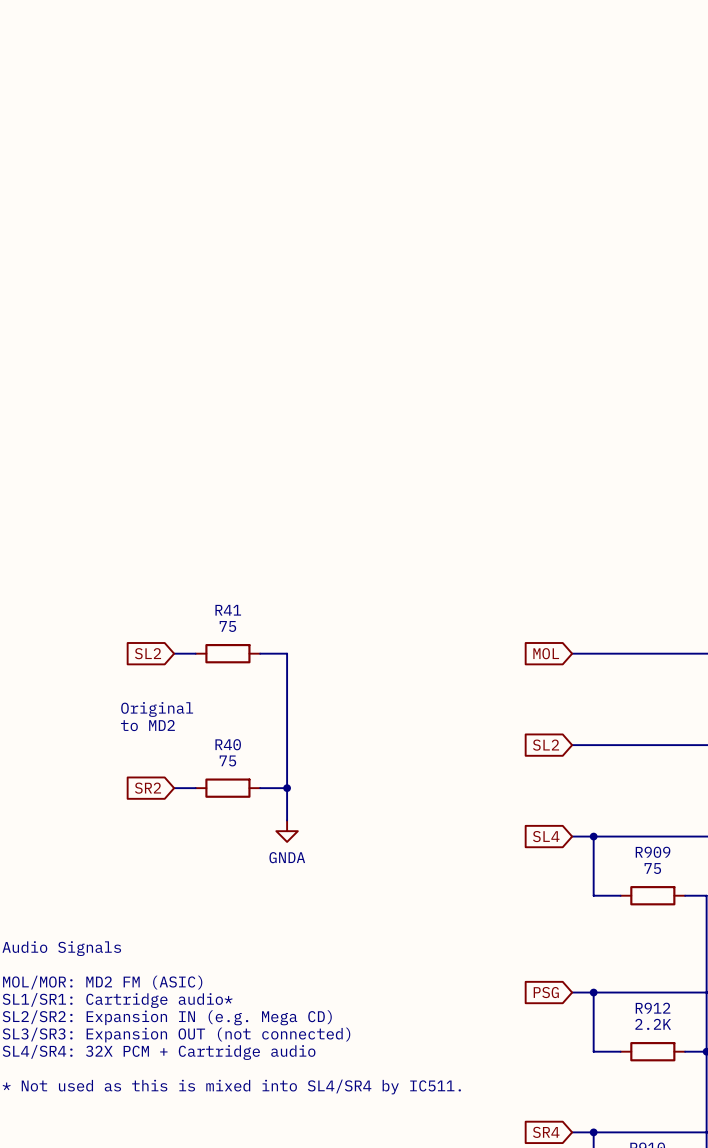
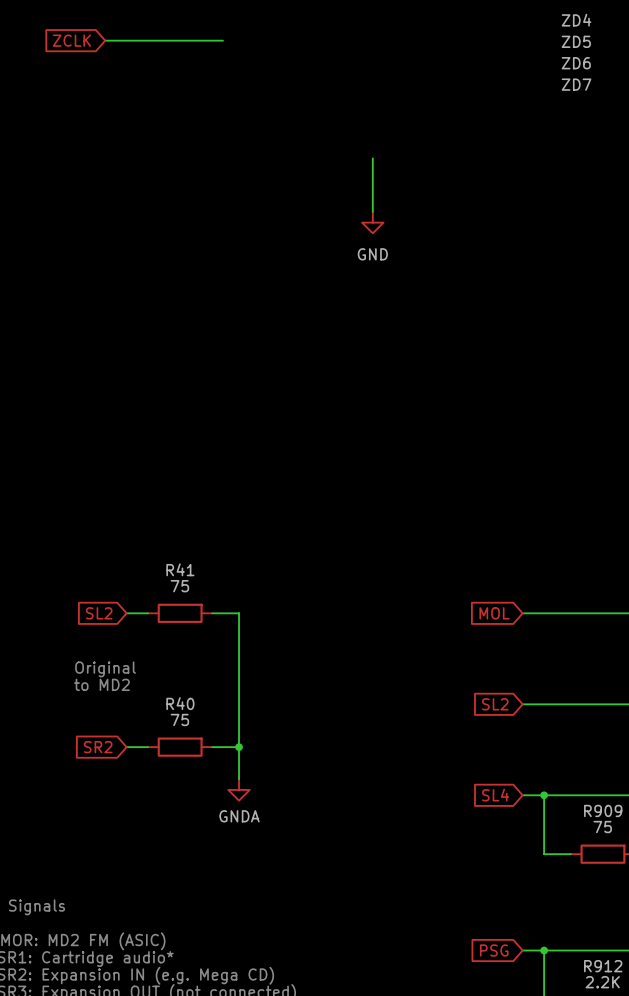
label: none -> ZD4 (576, 20)
global label: none -> ZCLK (71, 40)
wire: none -> (105, 40) (222, 40)
label: none -> ZD5 (576, 41)
label: none -> ZD6 (576, 63)
label: none -> ZD7 (576, 84)
wire: none -> (372, 158) (372, 211)
power symbol: none -> GND (372, 222)

